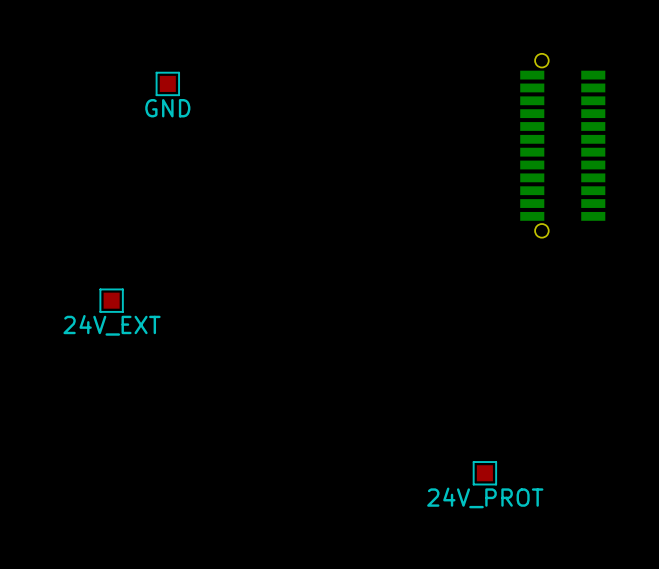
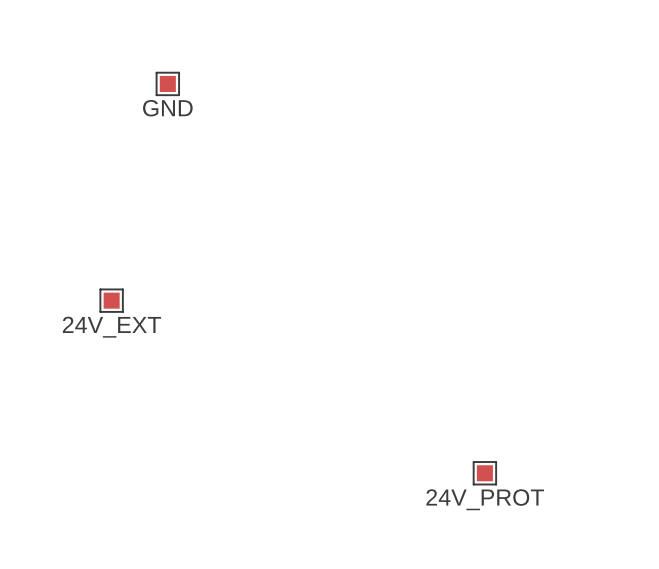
part: (562, 145) -> none

